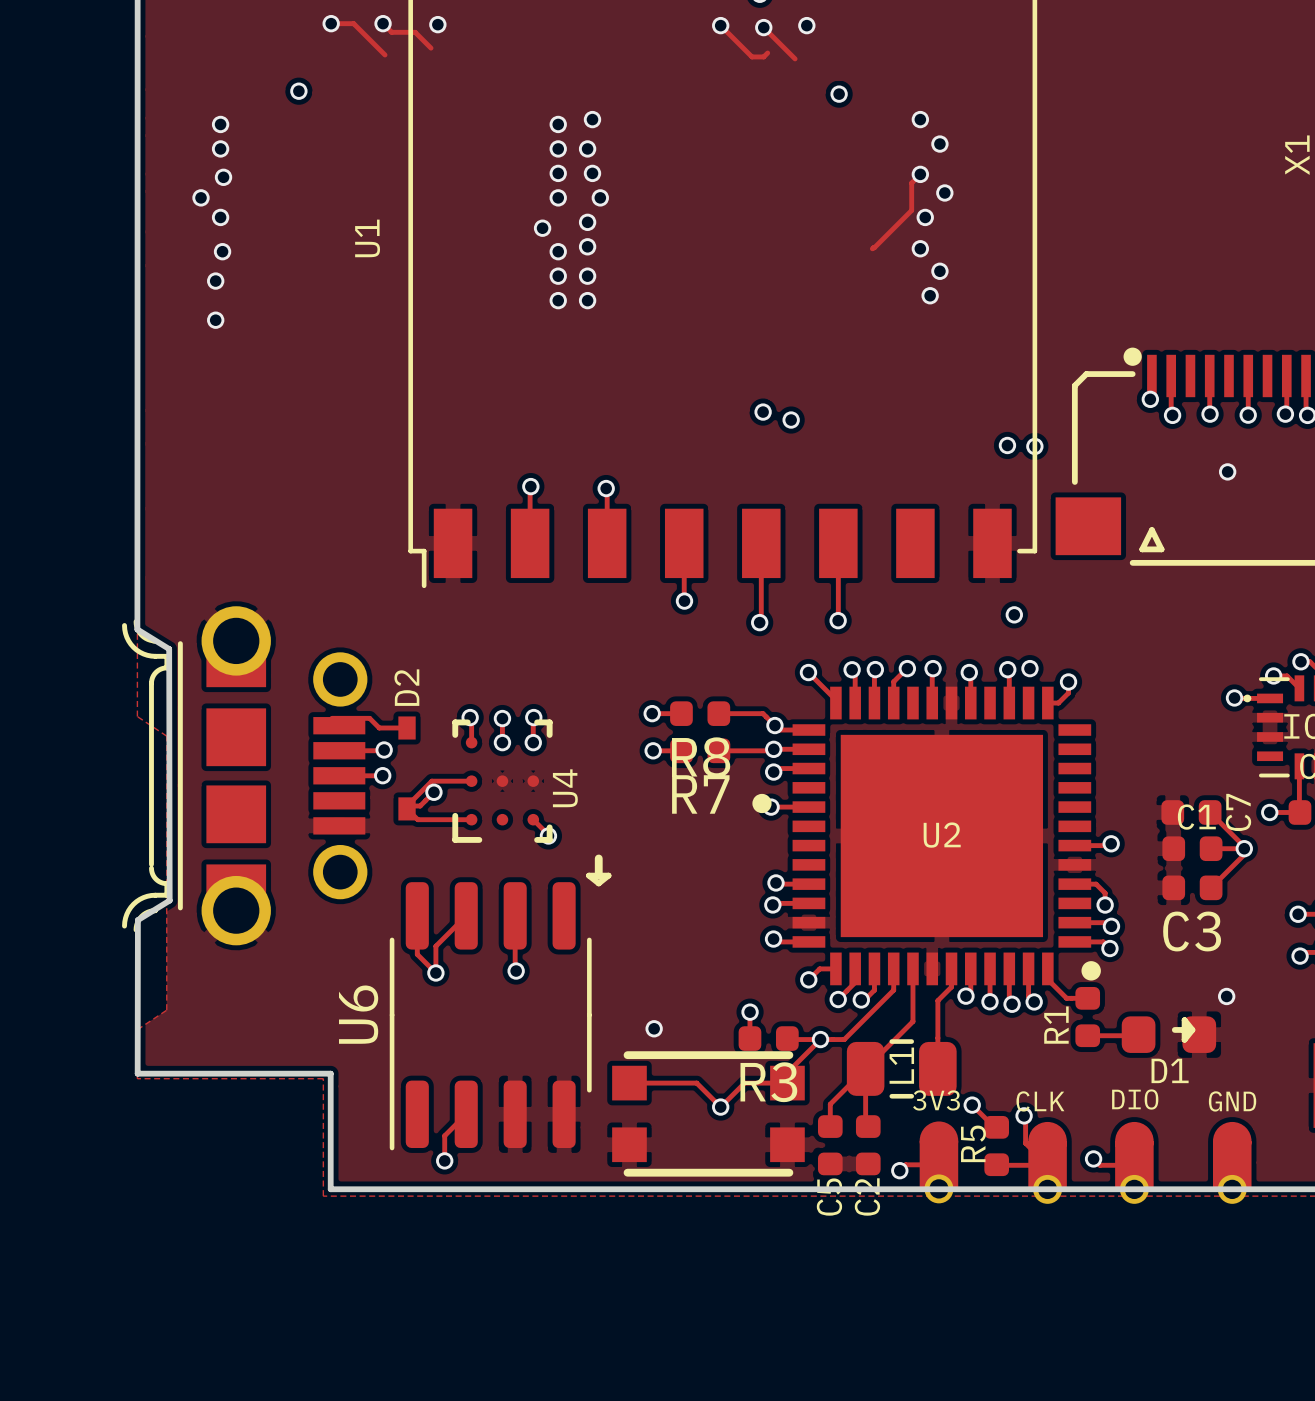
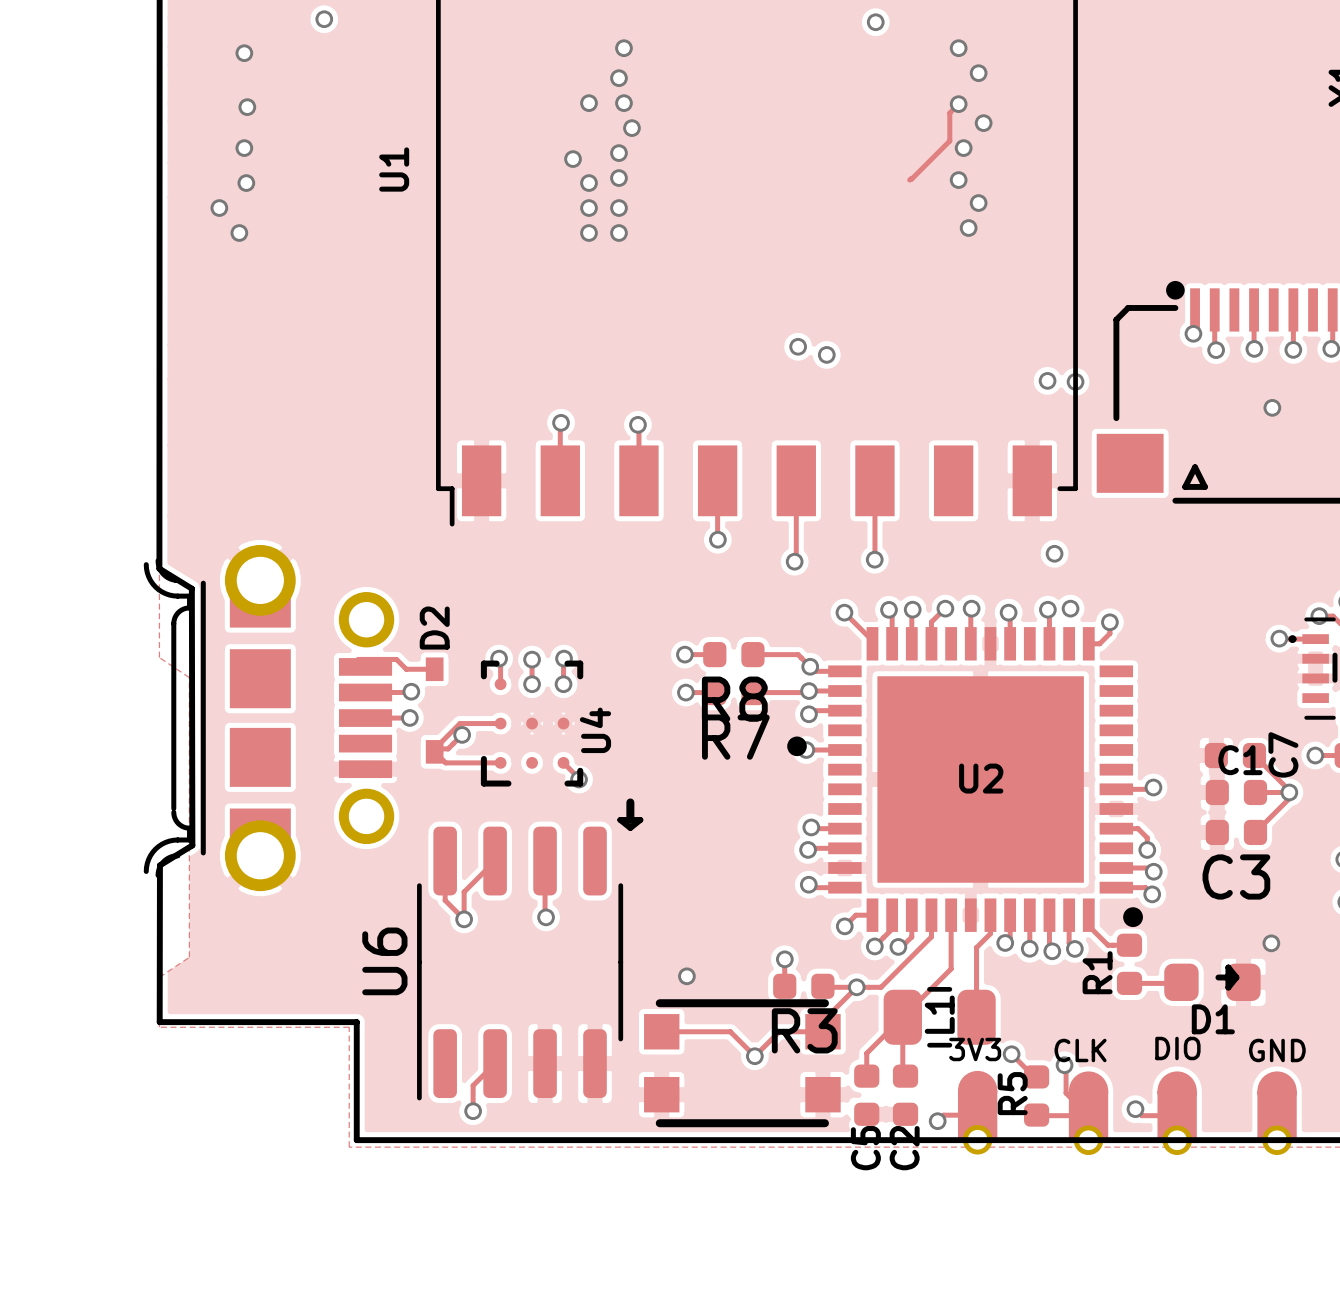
via: (558, 124) -> none
via: (220, 148) -> none
via: (558, 148) -> none
via: (201, 197) -> none
via: (558, 197) -> none
via: none -> (219, 208)
via: (215, 281) -> none
via: none -> (239, 233)
via: (215, 320) -> none

